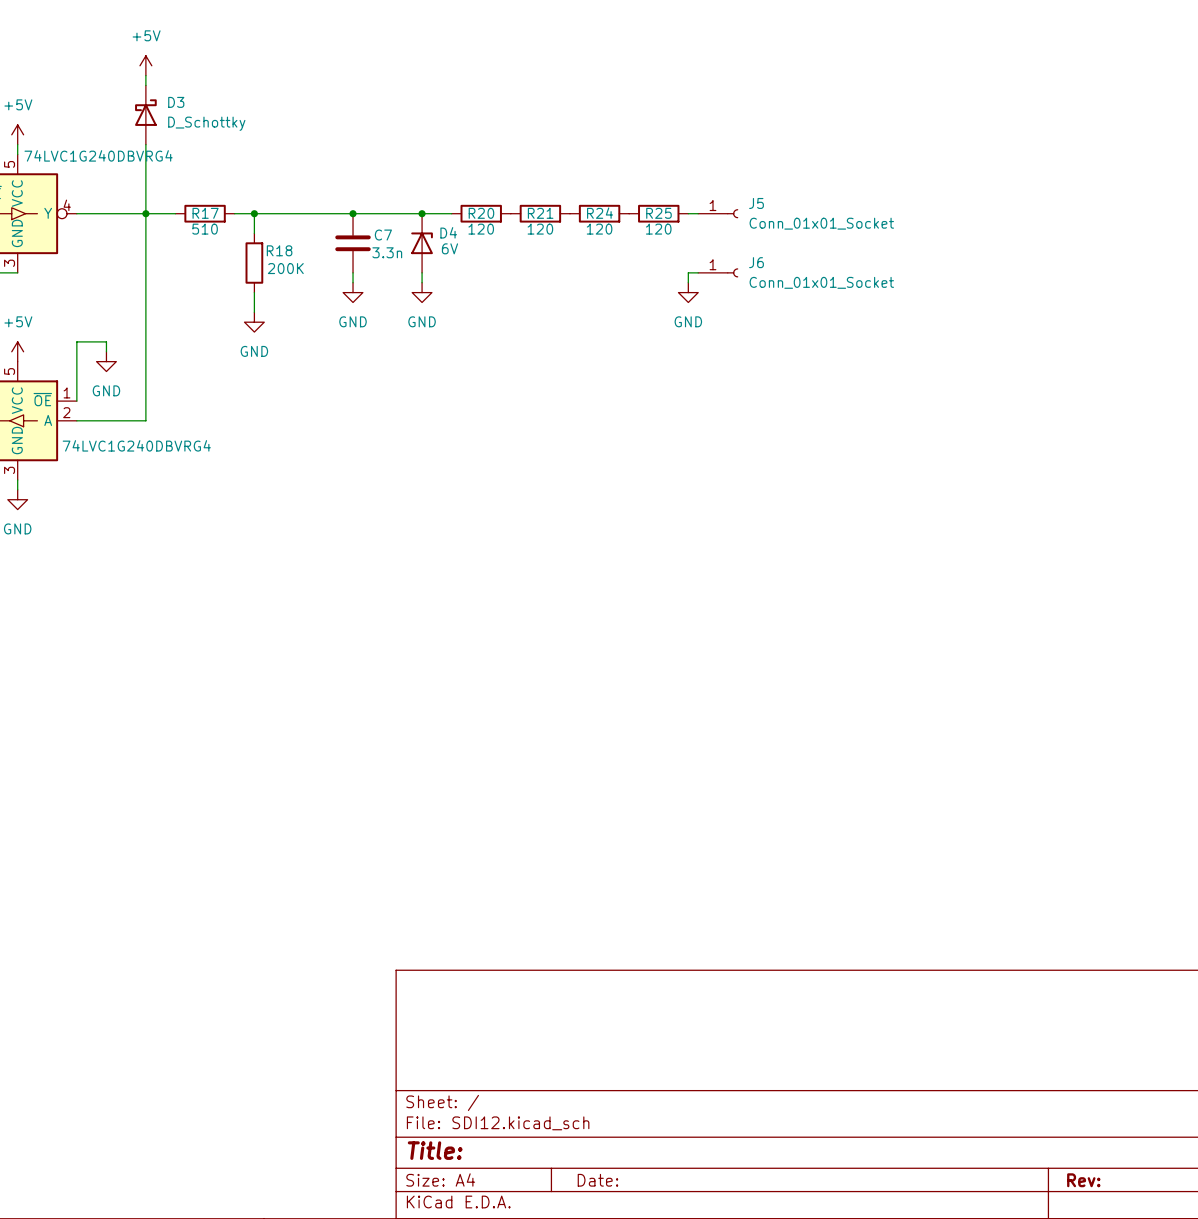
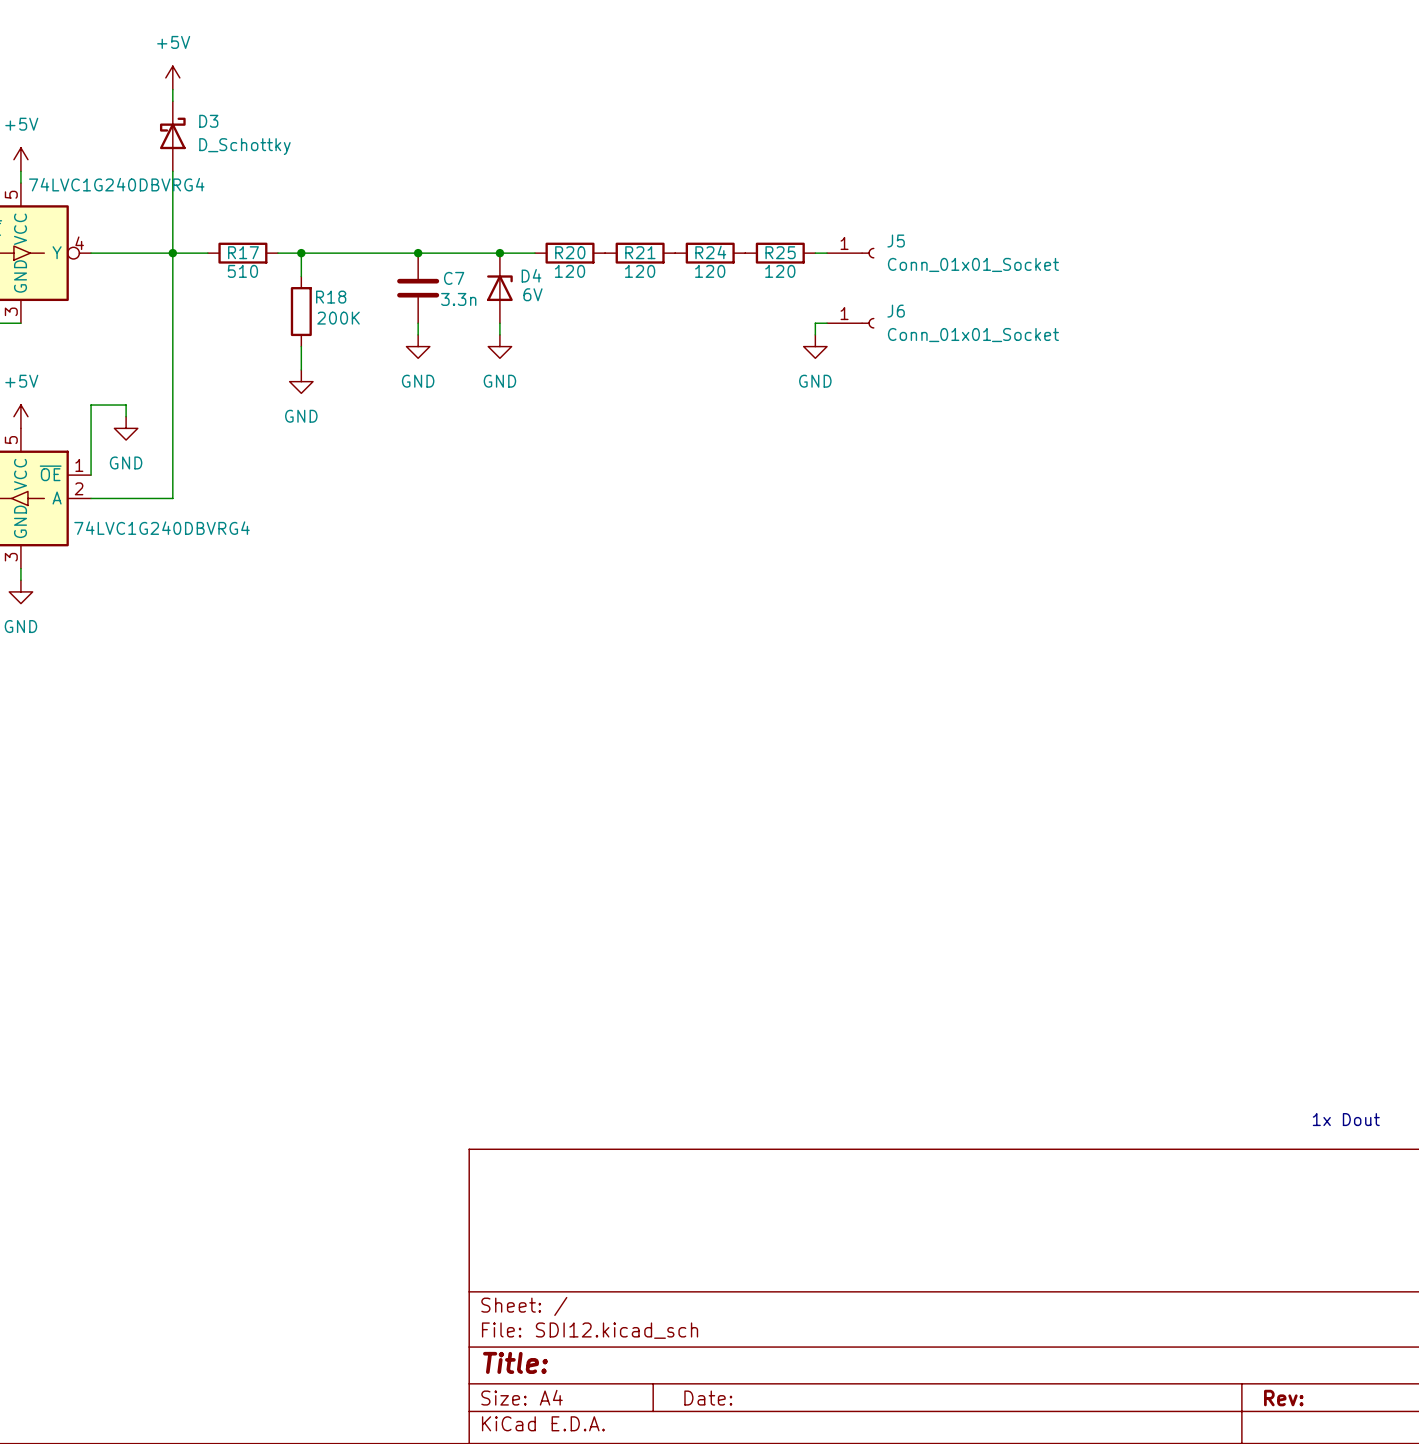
text: none -> 1x Dout (1346, 1119)

